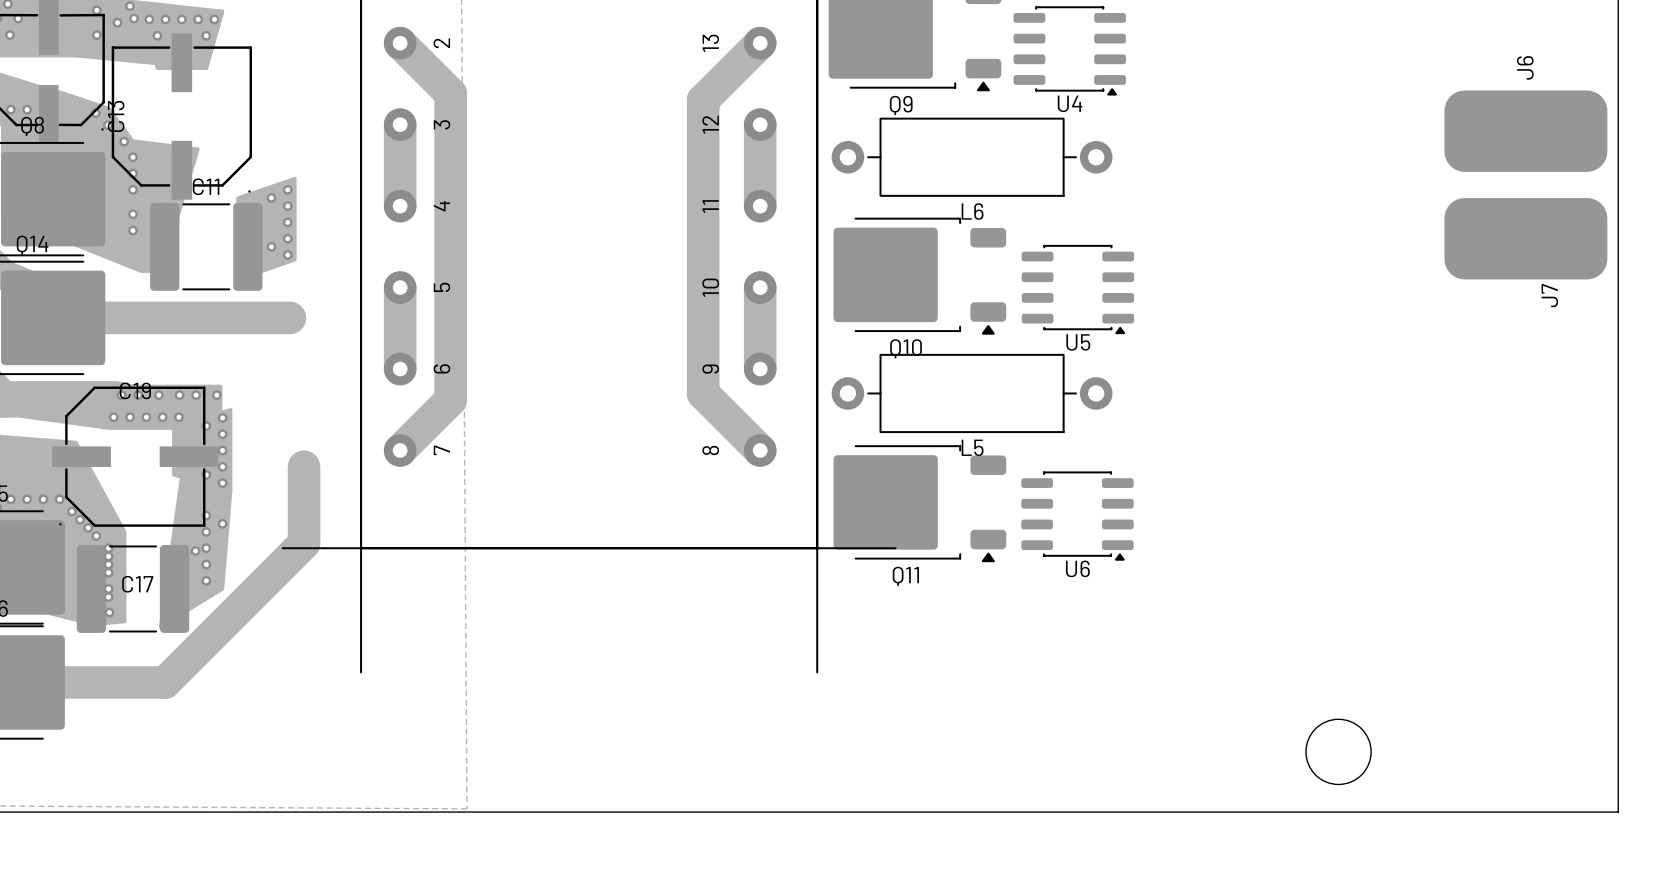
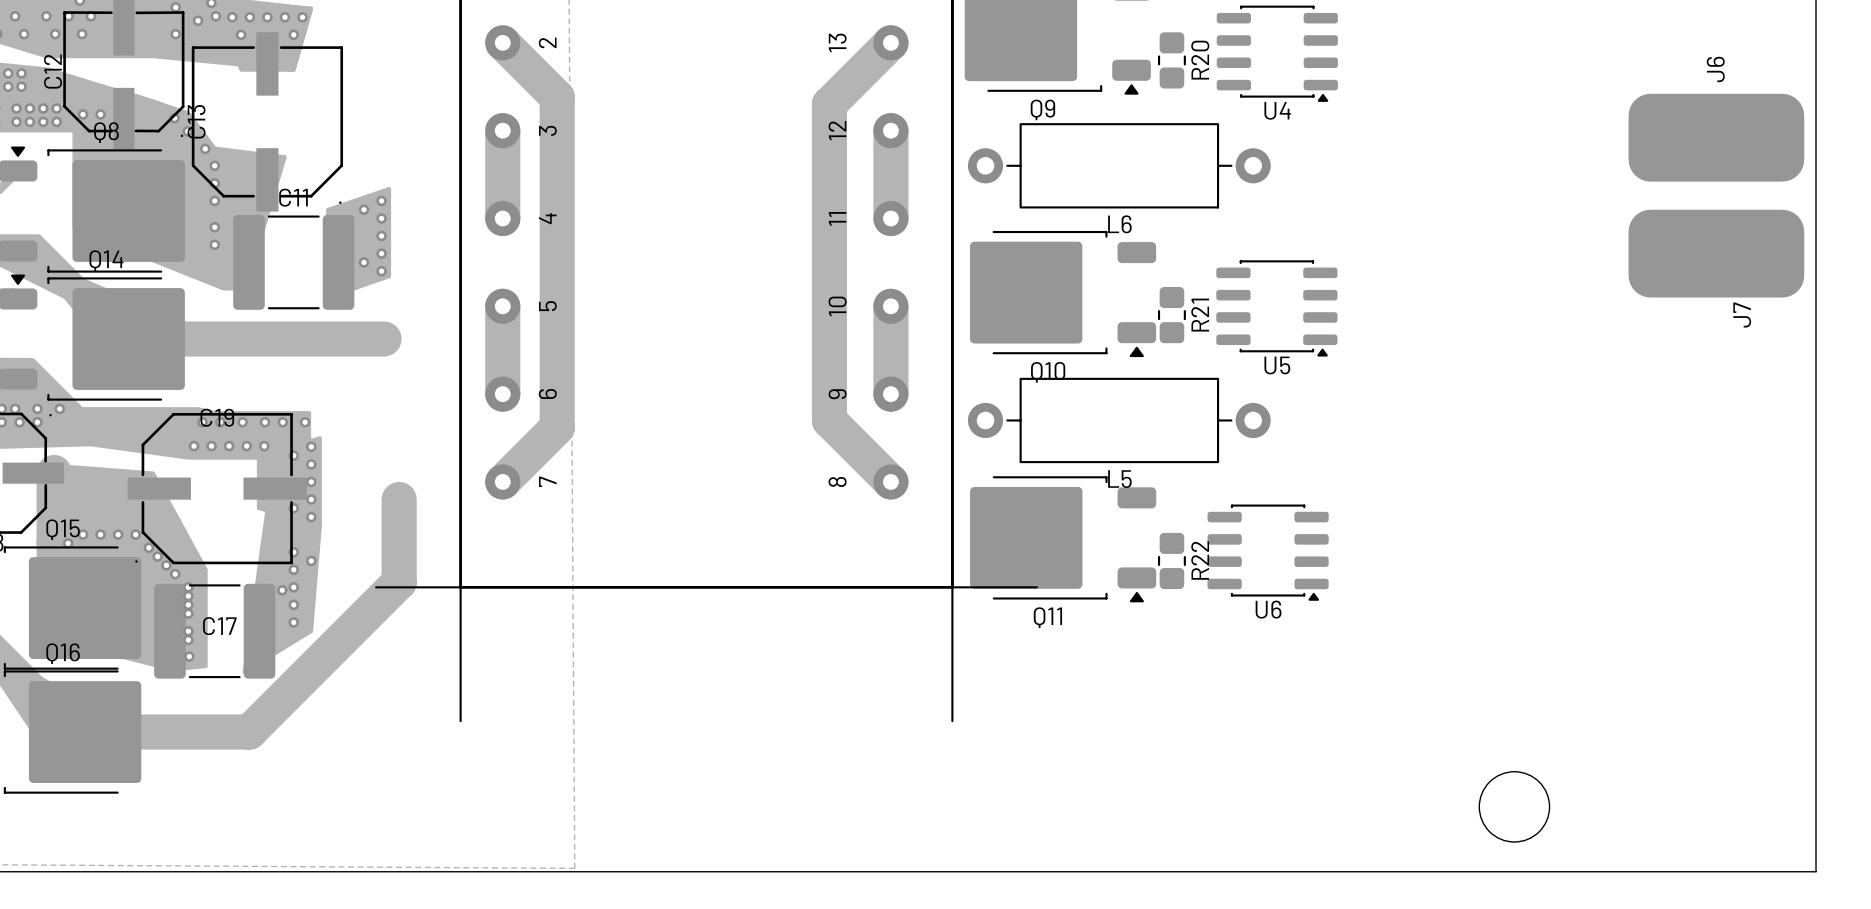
U4 position: (1069, 50) -> (1277, 53)
R20: none -> (1171, 60)
U5 position: (1077, 289) -> (1276, 308)
R21: none -> (1171, 315)
U6 position: (1077, 516) -> (1268, 552)
R22: none -> (1171, 560)

